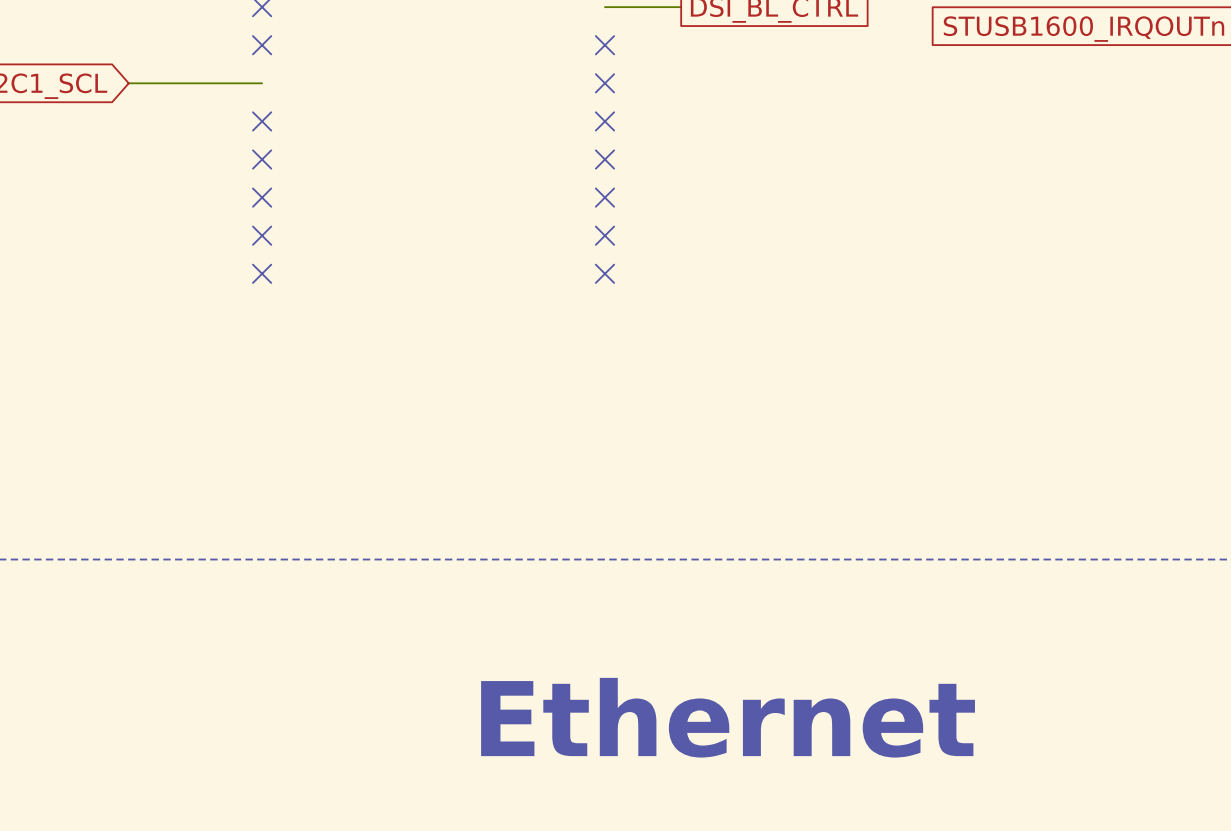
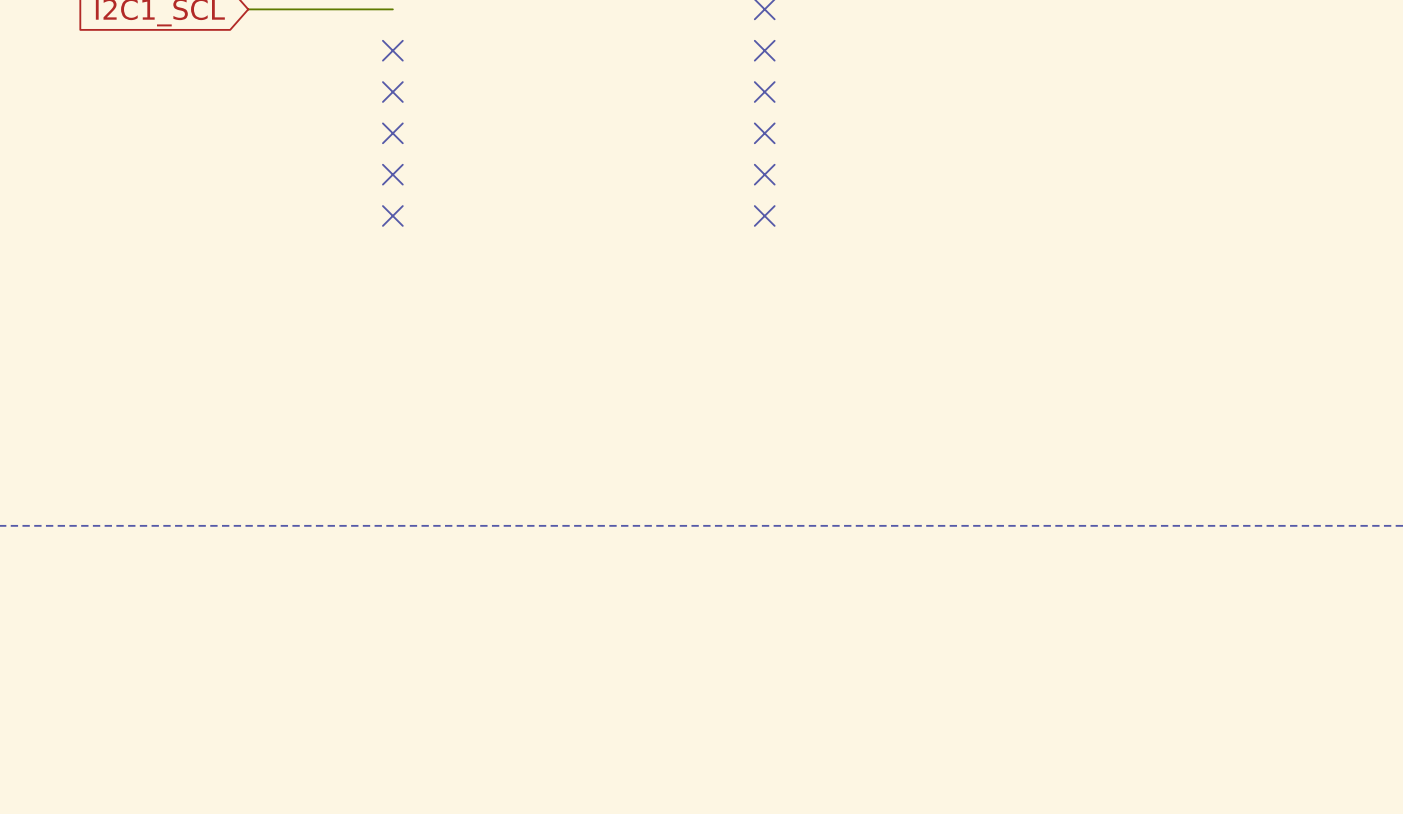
text: Ethernet (728, 717) -> none

